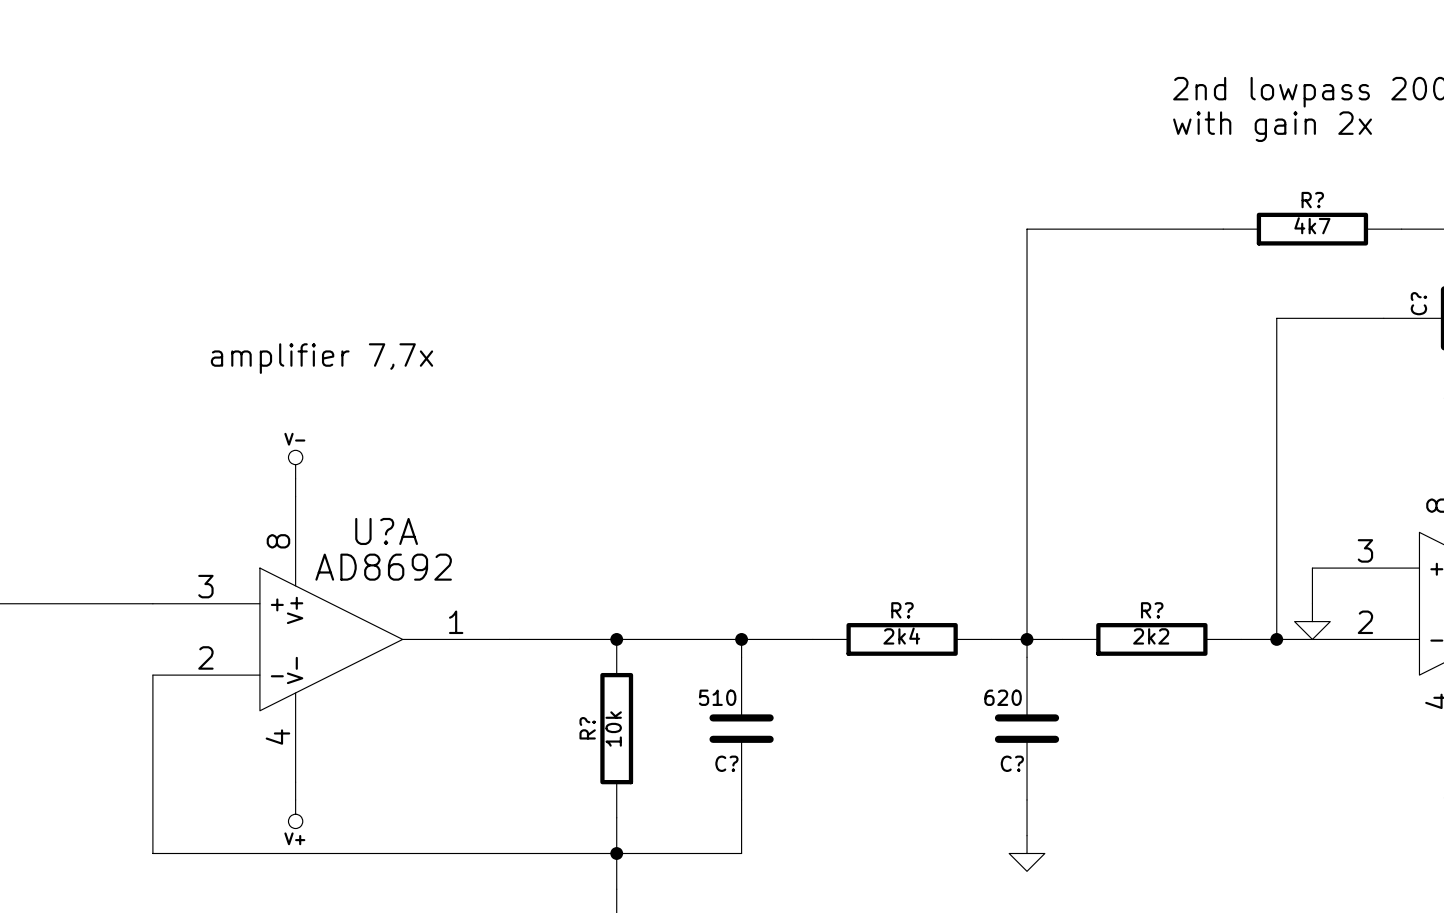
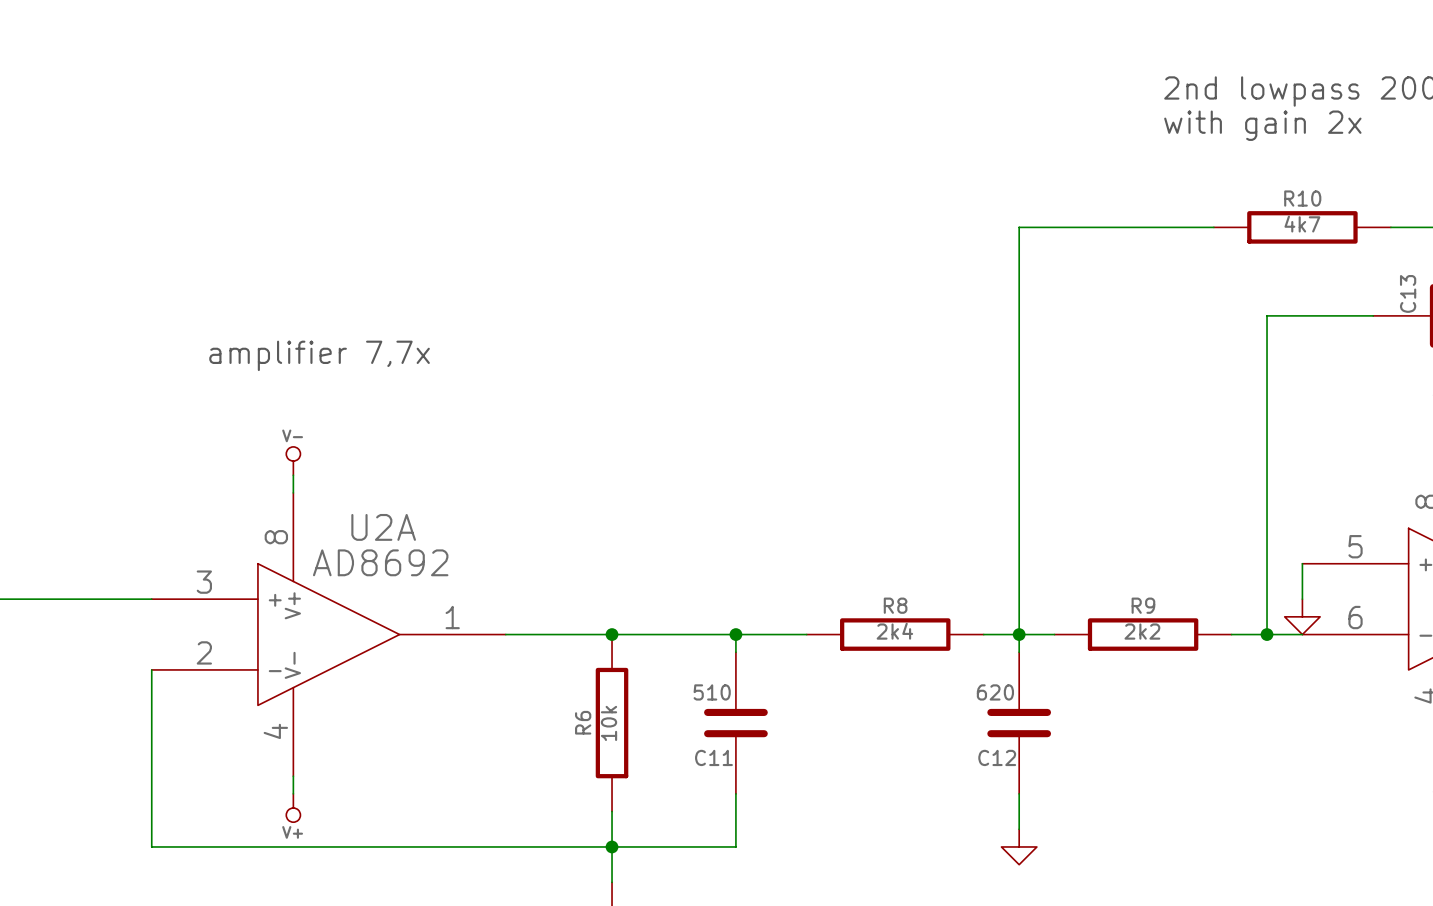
R? name: R? (1312, 200) -> R10 (1302, 198)
C? name: C? (1418, 303) -> C13 (1408, 293)
U?A name: U?A (386, 531) -> U2A (383, 527)
part pin number: 3 (1365, 550) -> 5 (1355, 546)
R? name: R? (902, 610) -> R8 (895, 605)
R? name: R? (1152, 610) -> R9 (1143, 605)
part pin number: 2 (1365, 622) -> 6 (1355, 617)
R? name: R? (587, 728) -> R6 (583, 722)
C? name: C? (726, 763) -> C11 (713, 757)
C? name: C? (1012, 763) -> C12 (997, 757)

